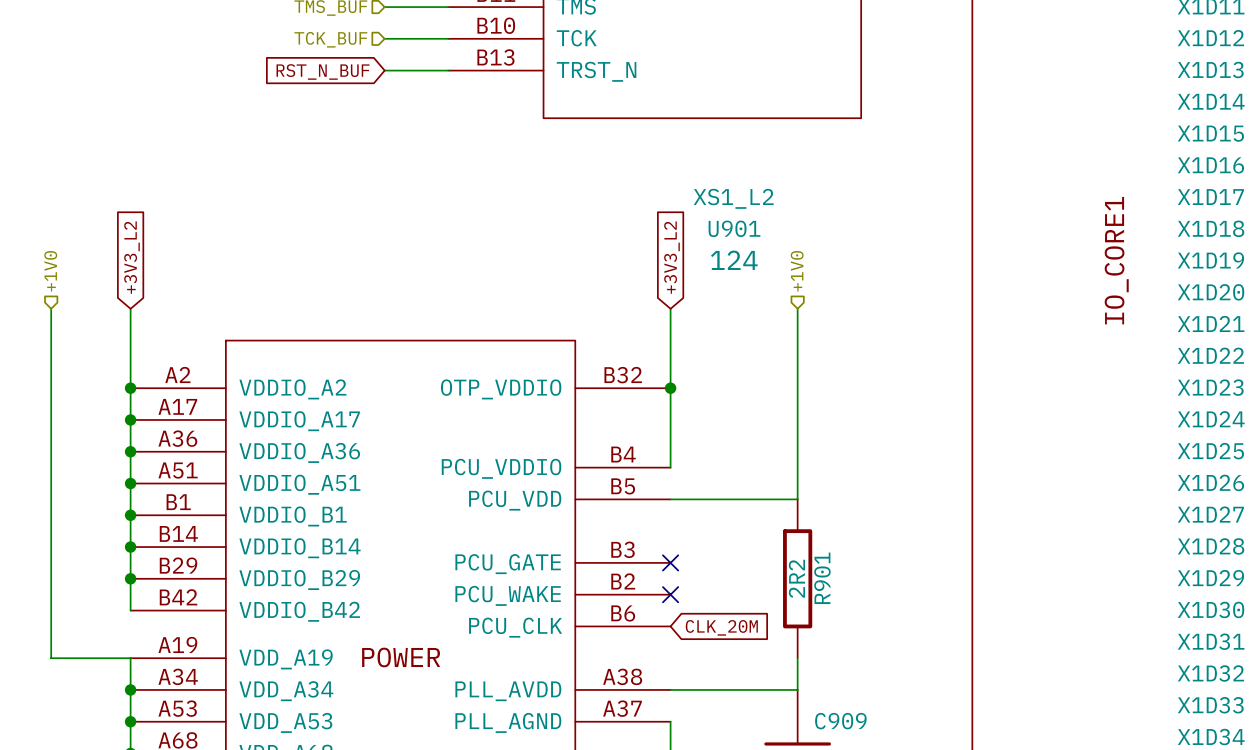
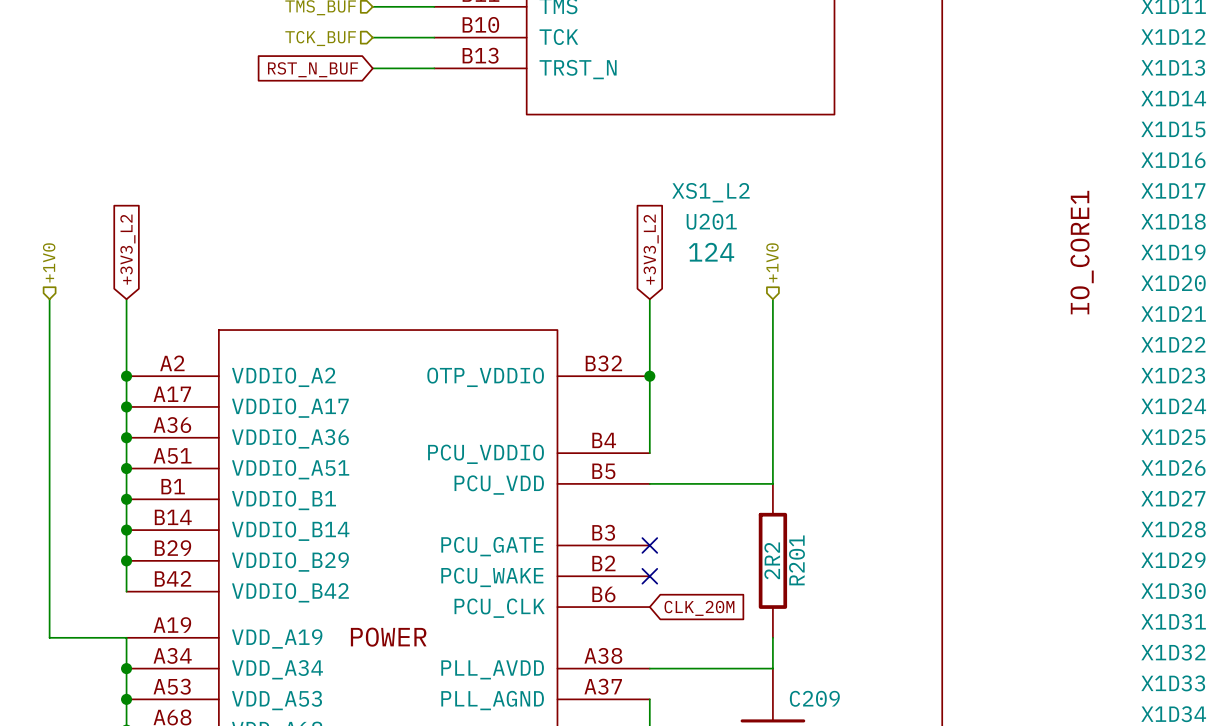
U901 name: U901 (734, 228) -> U201 (711, 221)
R901 name: R901 (822, 578) -> R201 (796, 560)
C909 name: C909 (840, 721) -> C209 (814, 698)

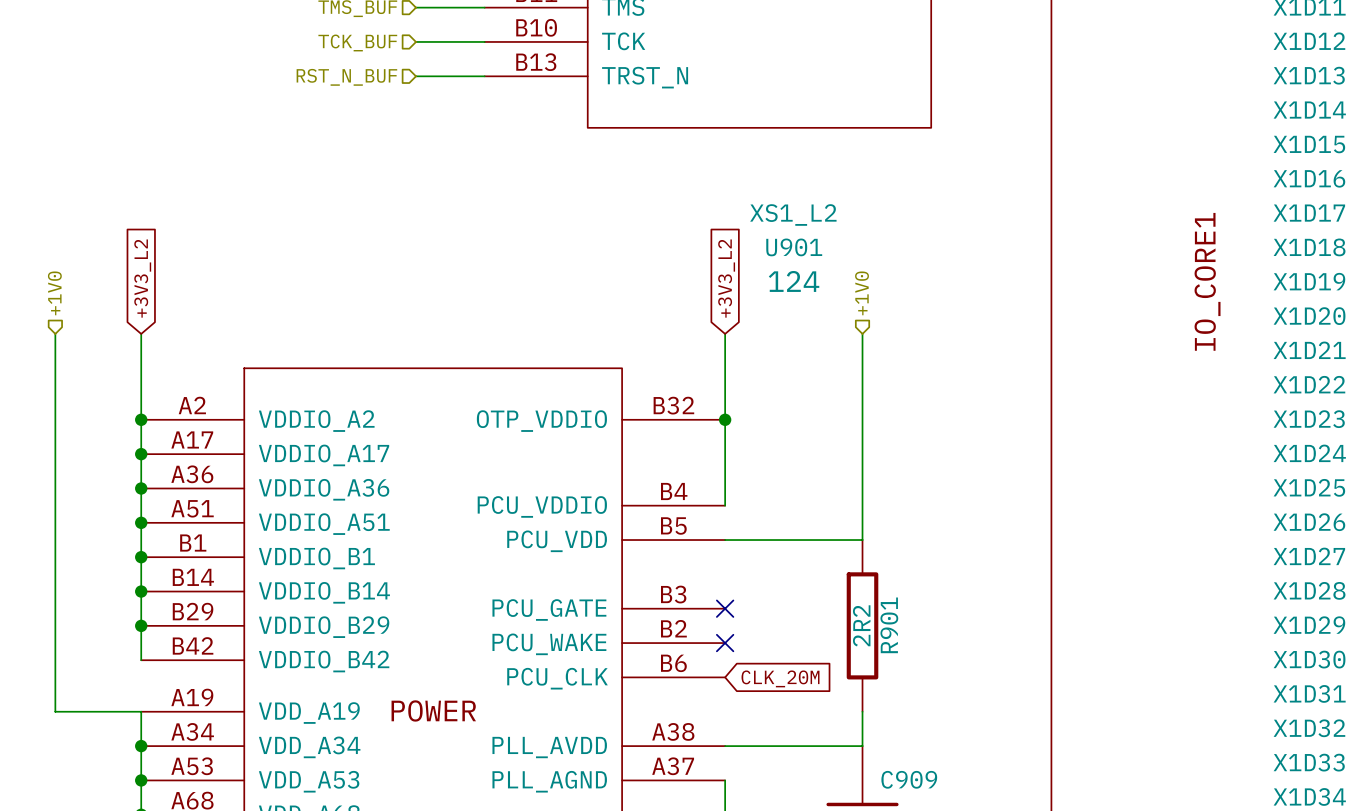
hierarchical label: none -> RST_N_BUF (346, 77)
global label: RST_N_BUF (313, 69) -> none
U201 name: U201 (711, 221) -> U901 (794, 247)
R201 name: R201 (796, 560) -> R901 (889, 625)
C209 name: C209 (814, 698) -> C909 (909, 779)

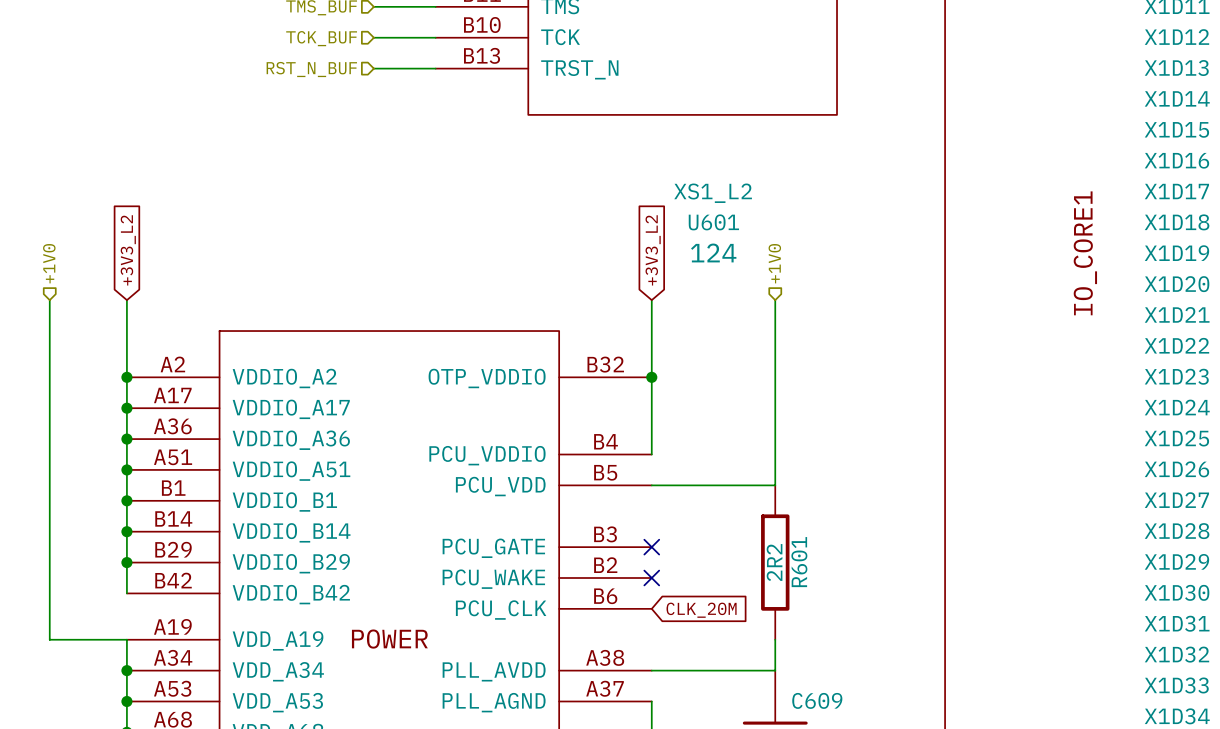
U901 name: U901 (794, 247) -> U601 (713, 222)
R901 name: R901 (889, 625) -> R601 (799, 562)
C909 name: C909 (909, 779) -> C609 (817, 700)

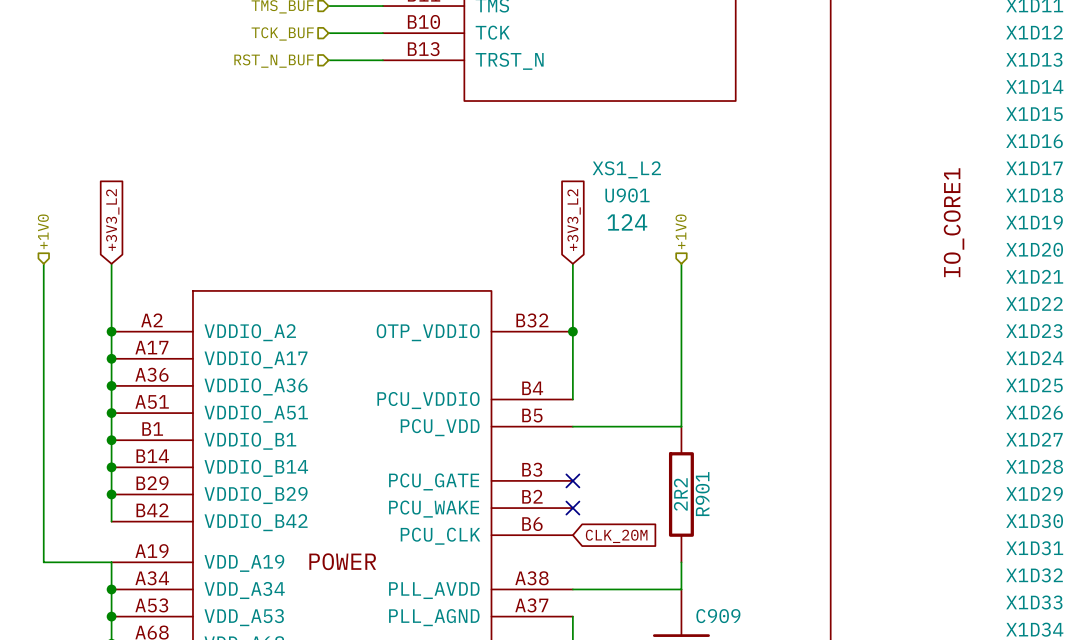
U601 name: U601 (713, 222) -> U901 (627, 195)
R601 name: R601 (799, 562) -> R901 (702, 494)
C609 name: C609 (817, 700) -> C909 (718, 616)

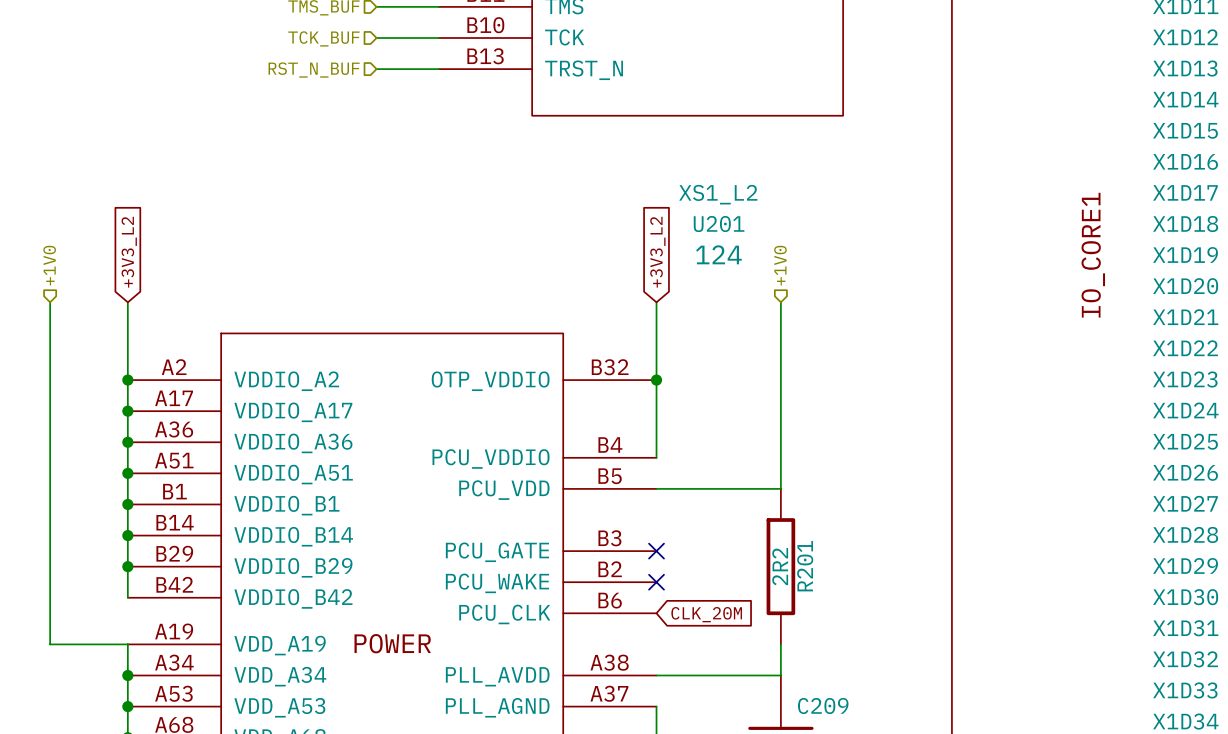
U901 name: U901 (627, 195) -> U201 (719, 224)
R901 name: R901 (702, 494) -> R201 (805, 566)
C909 name: C909 (718, 616) -> C209 (823, 706)

